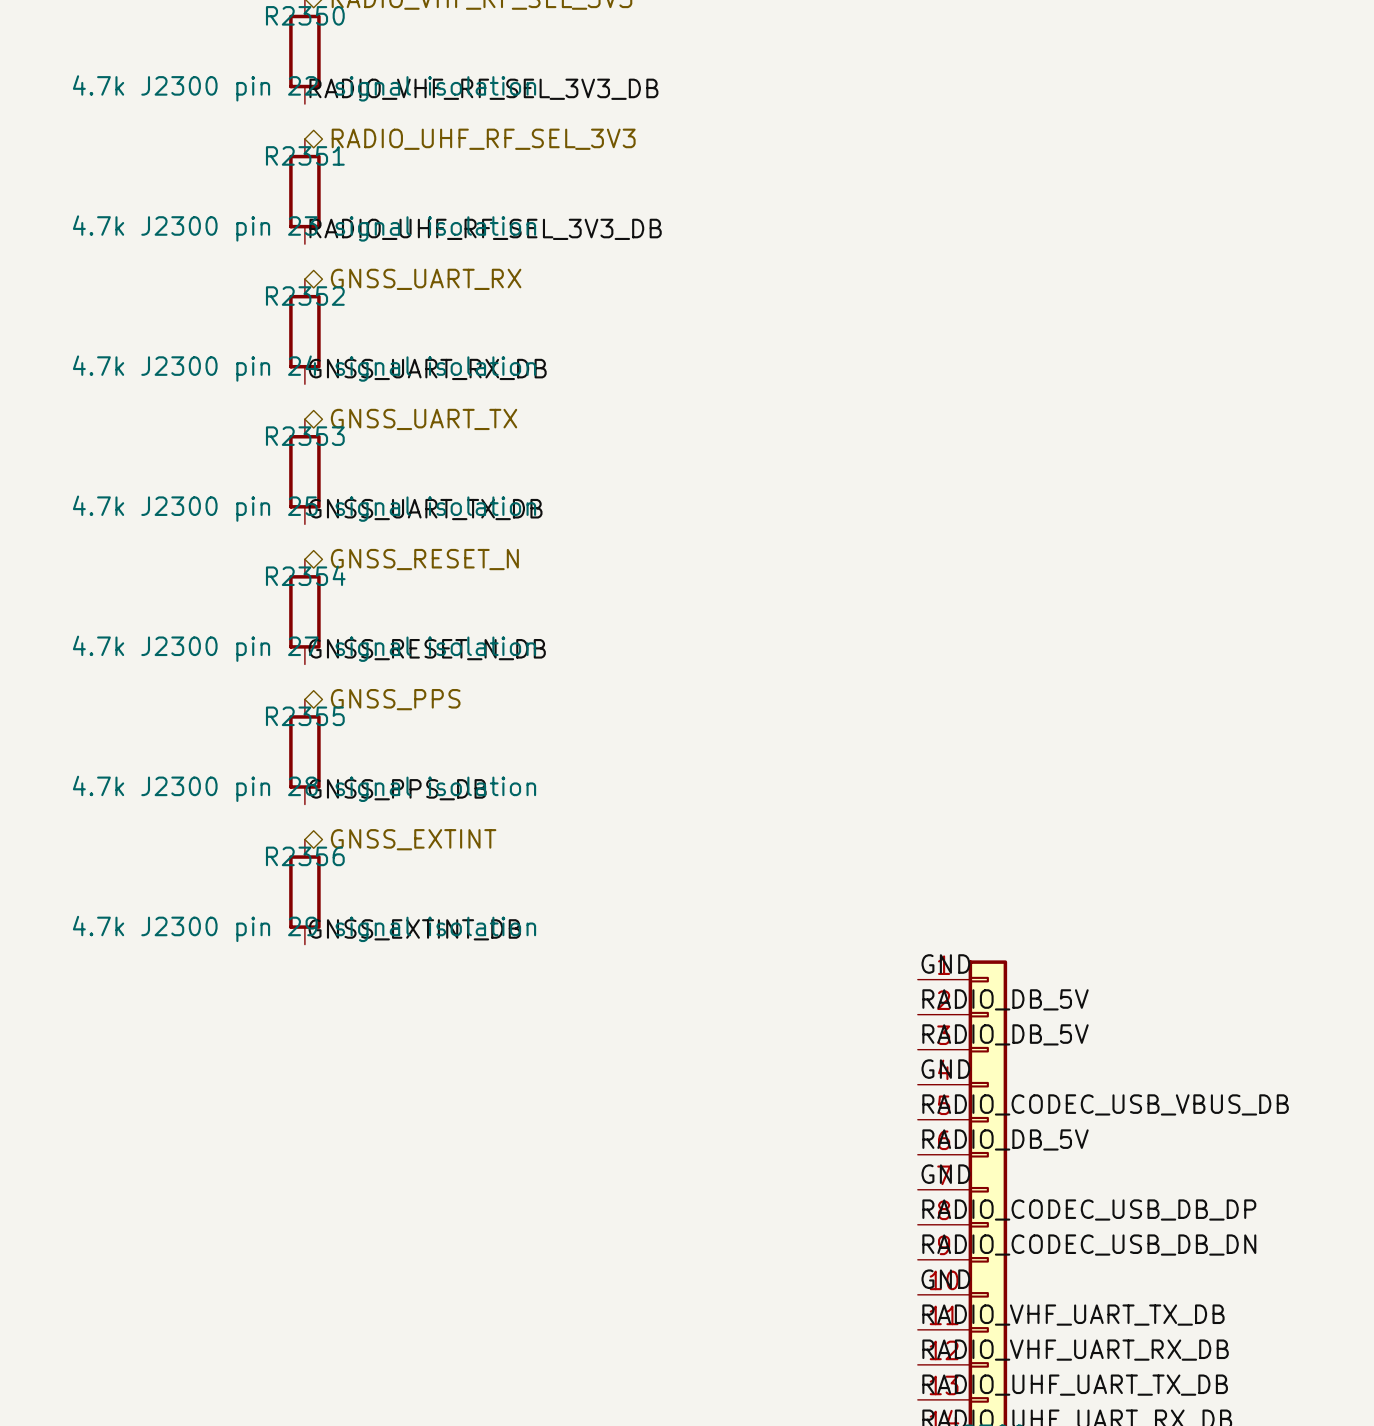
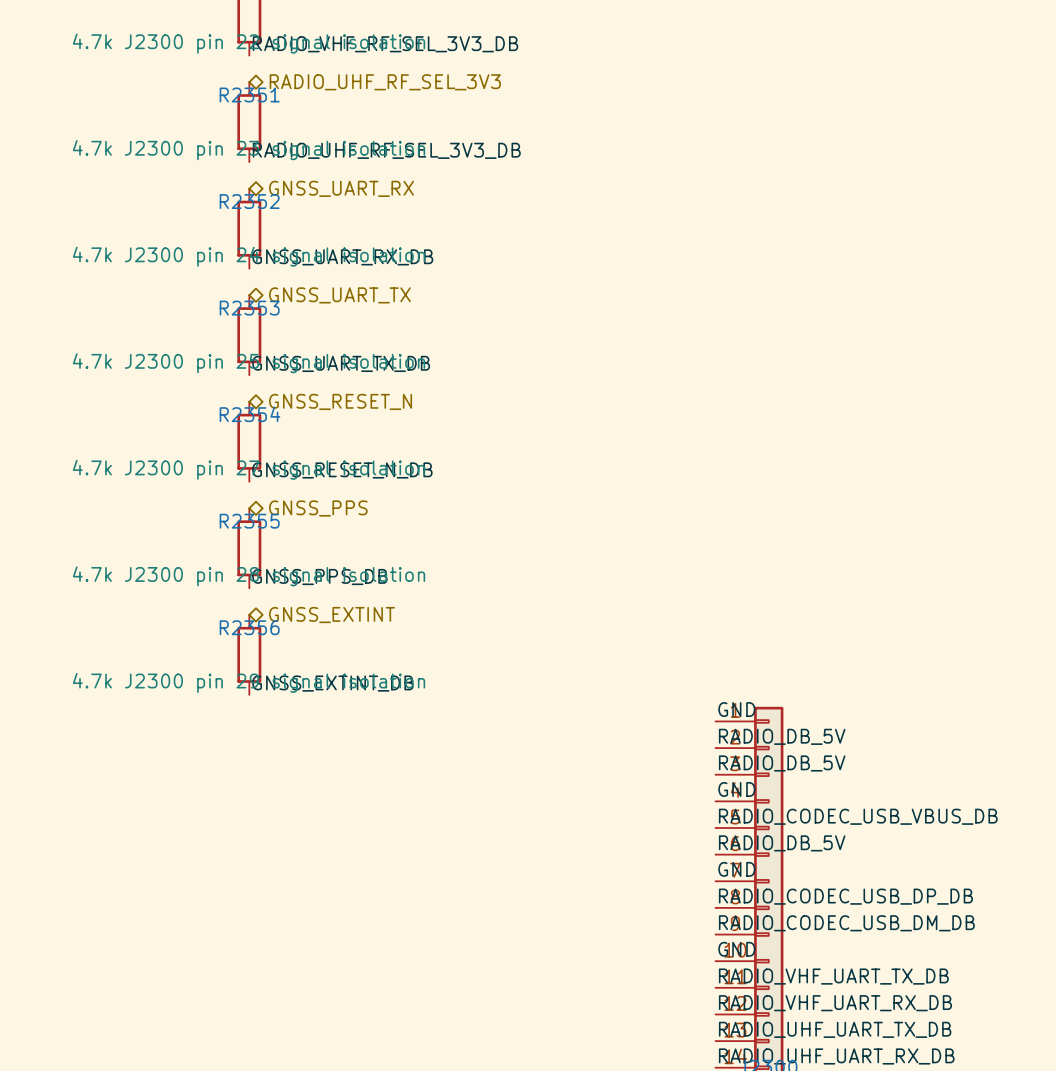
label: RADIO_CODEC_USB_DB_DP (1089, 1209) -> RADIO_CODEC_USB_DP_DB (845, 896)
label: RADIO_CODEC_USB_DB_DN (1089, 1245) -> RADIO_CODEC_USB_DM_DB (846, 923)

